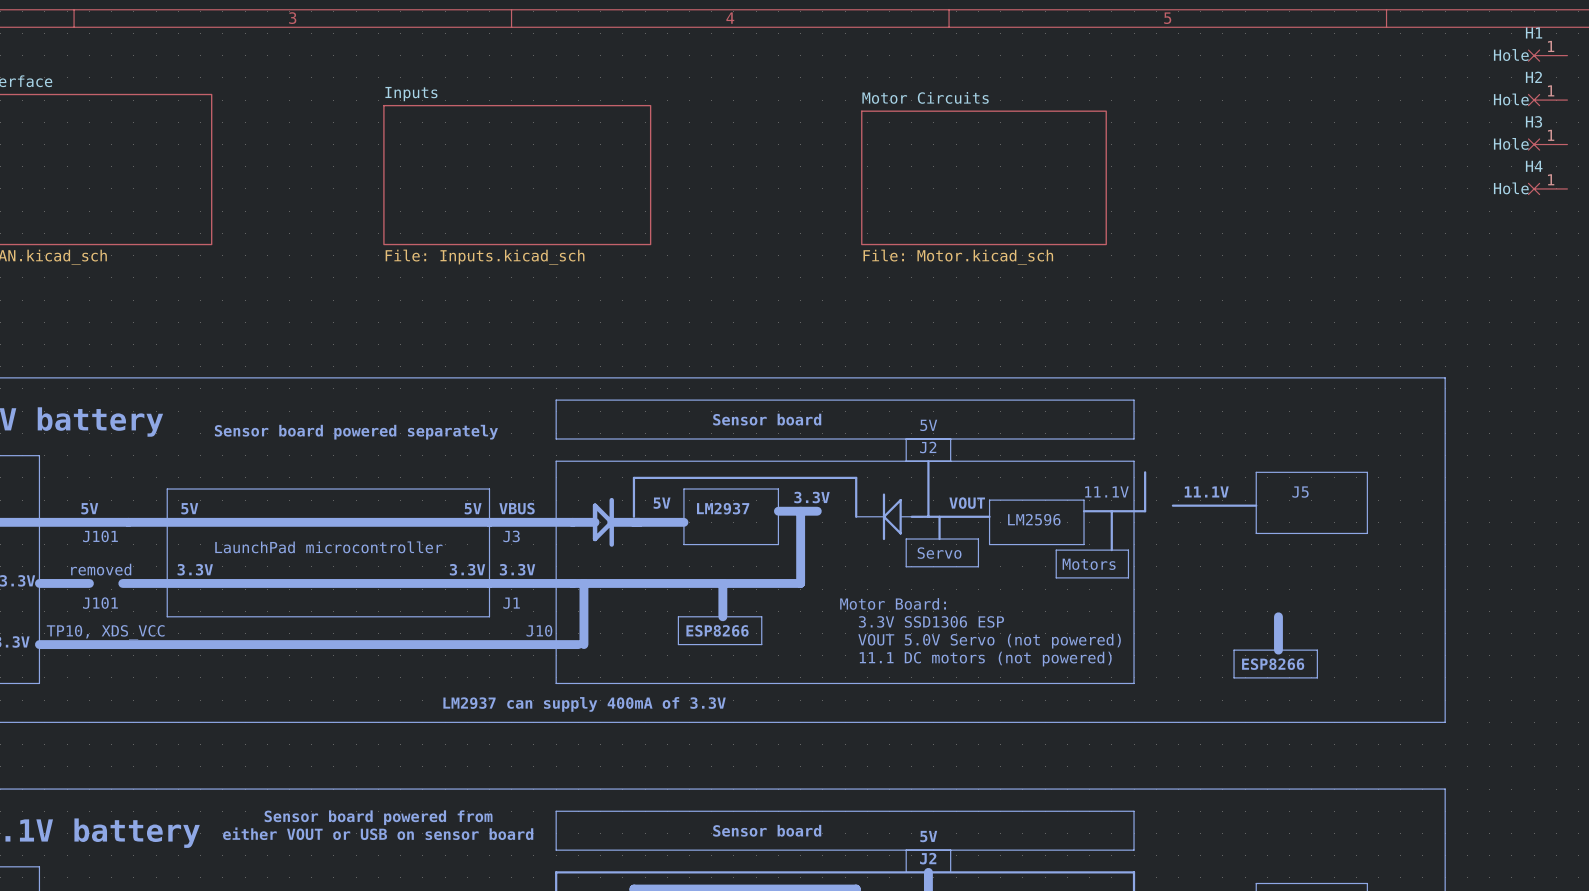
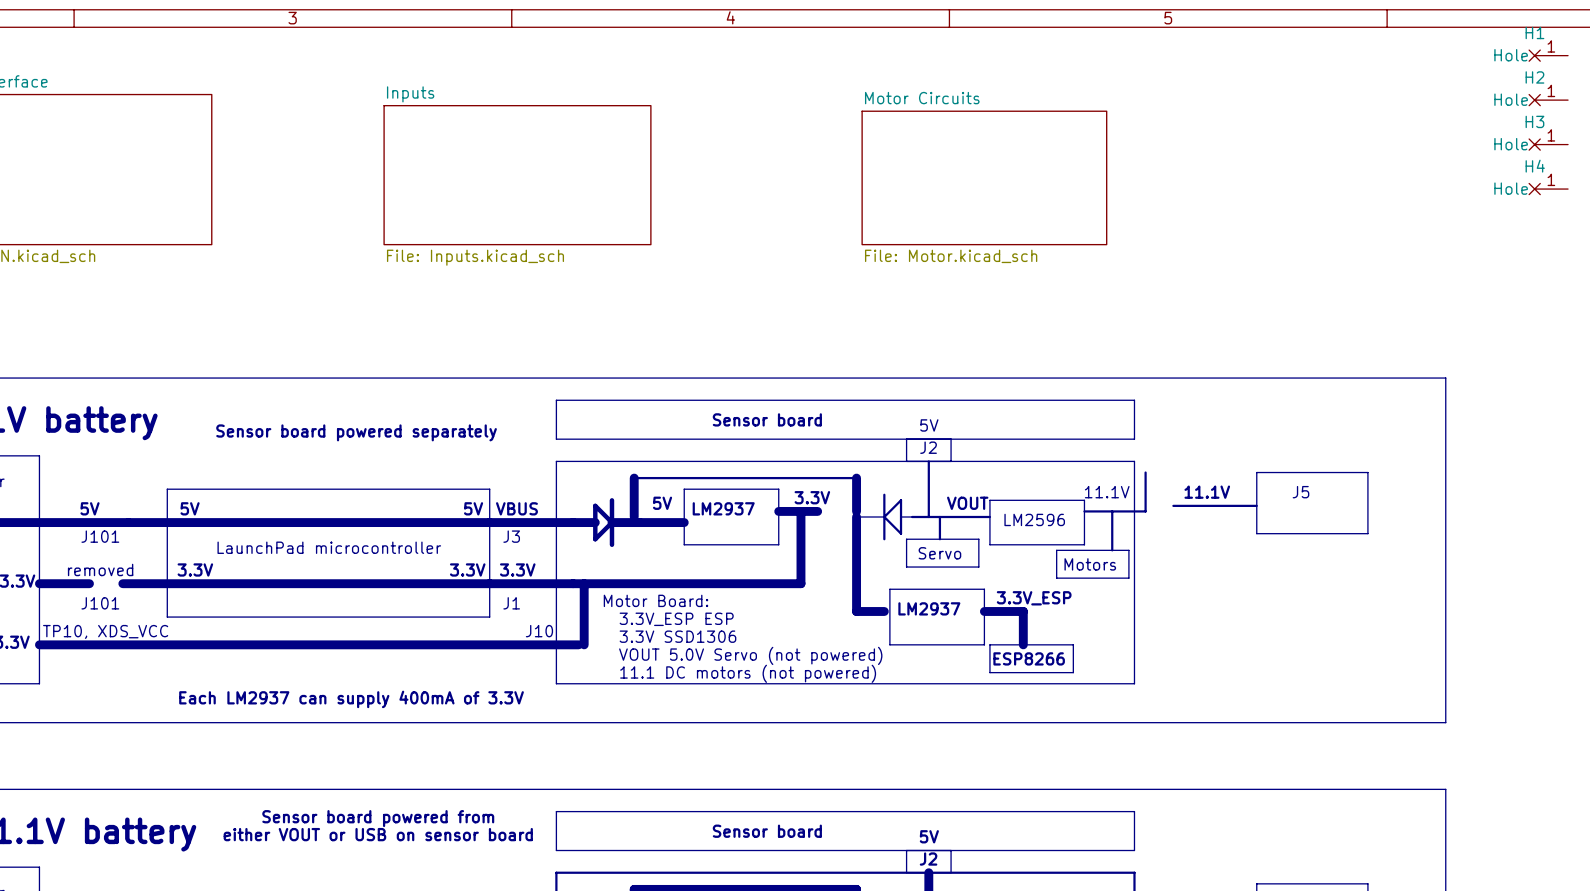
line width: thin (633, 477) (633, 516) -> thick (634, 478) (634, 516)
line width: thin (856, 477) (856, 511) -> thick (856, 478) (856, 511)
line: (856, 511) (856, 516) -> (884, 611) (856, 611) (856, 516)
line: (722, 583) (722, 616) -> none
line: none -> (889, 589) (984, 589) (984, 644) (889, 644) (889, 589)
text: none -> 3.3V_ESP (1034, 598)
text: none -> Motor Board: (656, 600)
text: Motor Board: (893, 603) -> none
text: none -> LM2937 (929, 608)
line: none -> (984, 611) (1023, 611) (1023, 644)
line: (678, 616) (761, 616) (761, 644) (678, 644) (678, 616) -> none
line: (1278, 616) (1278, 650) -> none
text: none -> 3.3V_ESP ESP (676, 619)
text: 3.3V SSD1306 ESP (931, 621) -> none
text: ESP8266 (717, 630) -> none
text: none -> 3.3V SSD1306 (677, 636)
text: VOUT 5.0V Servo (not powered) (989, 641) -> none
line: none -> (989, 644) (989, 672) (1073, 672) (1073, 644) (989, 644)
line: (1234, 650) (1317, 650) (1317, 677) (1234, 677) (1234, 650) -> none
text: none -> VOUT 5.0V Servo (not powered) (750, 655)
text: none -> ESP8266 (1029, 658)
text: 11.1 DC motors (not powered) (985, 659) -> none
text: ESP8266 (1273, 664) -> none
text: none -> 11.1 DC motors (not powered) (748, 673)
text: none -> Each LM2937 can supply 400mA of 3.3V (351, 699)
text: LM2937 can supply 400mA of 3.3V (584, 704) -> none

